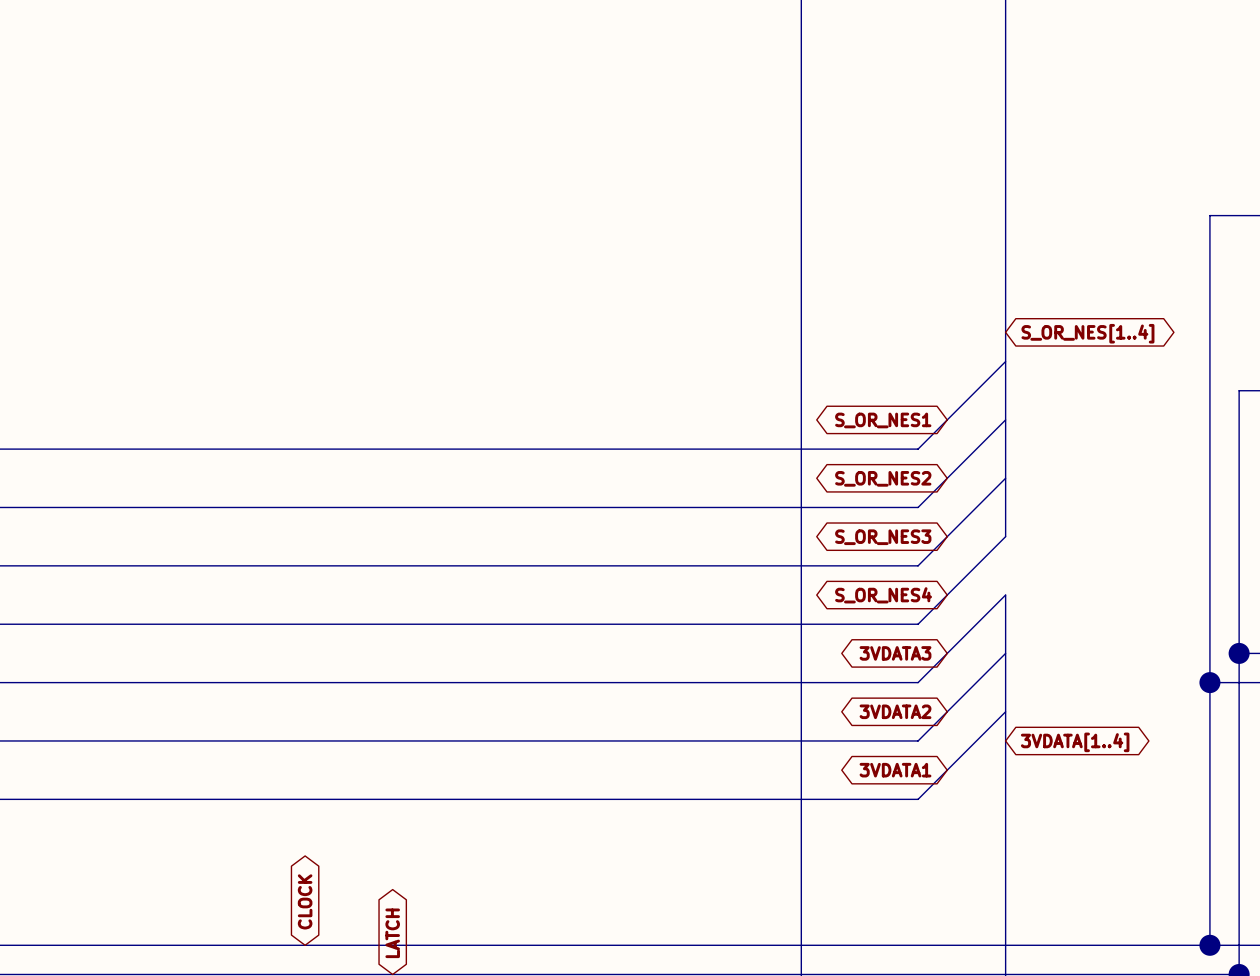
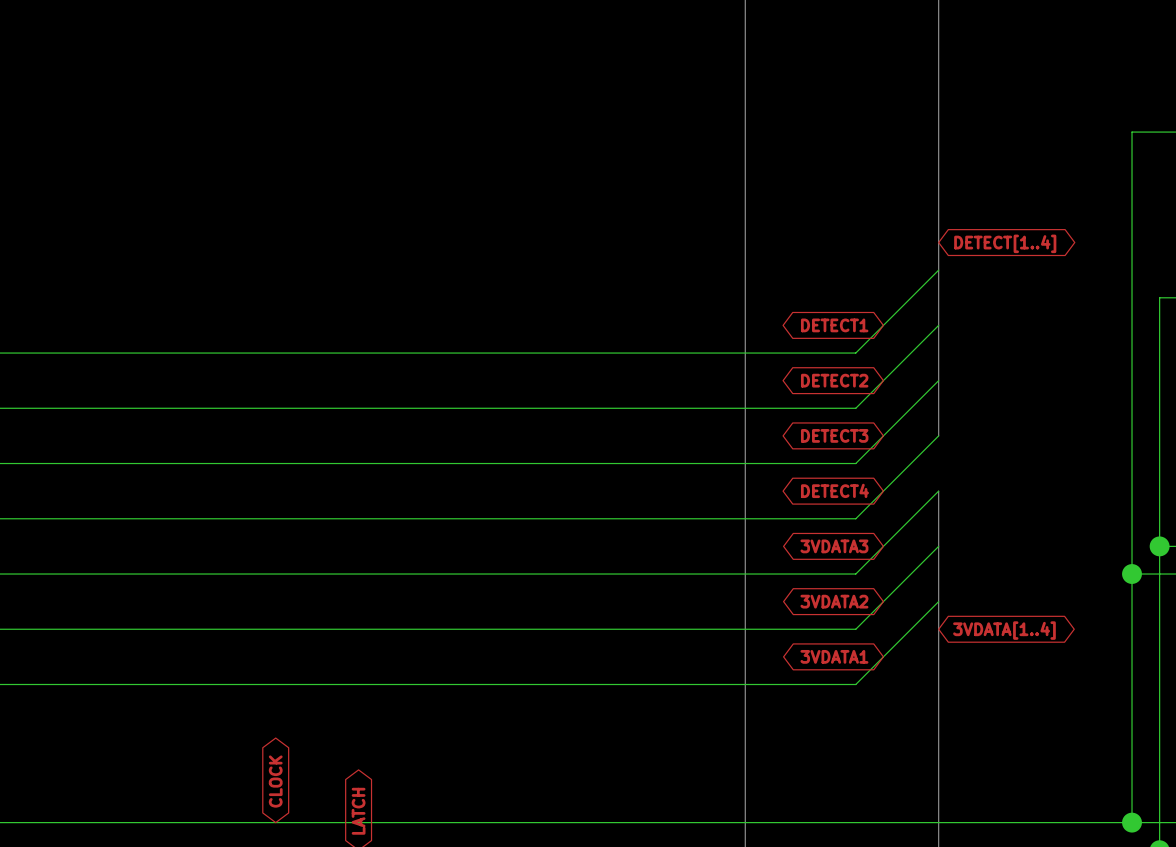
global label: S_OR_NES[1..4] (1087, 333) -> DETECT[1..4] (1005, 243)
global label: S_OR_NES1 (883, 420) -> DETECT1 (834, 325)
global label: S_OR_NES2 (883, 478) -> DETECT2 (834, 380)
global label: S_OR_NES3 (883, 537) -> DETECT3 (834, 435)
global label: S_OR_NES4 (883, 595) -> DETECT4 (834, 490)

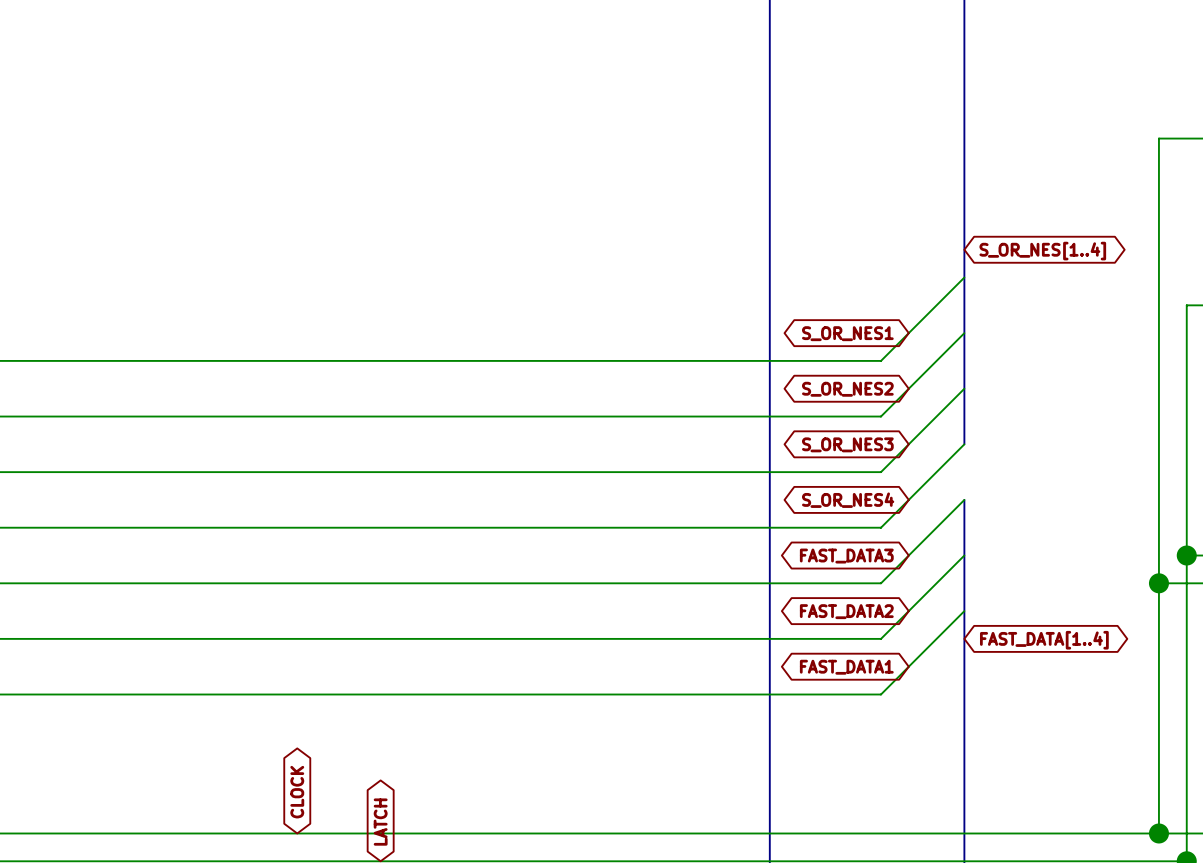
global label: DETECT[1..4] (1005, 243) -> S_OR_NES[1..4] (1042, 251)
global label: DETECT1 (834, 325) -> S_OR_NES1 (847, 333)
global label: DETECT2 (834, 380) -> S_OR_NES2 (847, 389)
global label: DETECT3 (834, 435) -> S_OR_NES3 (847, 444)
global label: DETECT4 (834, 490) -> S_OR_NES4 (848, 500)
global label: 3VDATA3 (834, 546) -> FAST_DATA3 (846, 556)
global label: 3VDATA2 (834, 601) -> FAST_DATA2 (846, 611)
global label: 3VDATA[1..4] (1004, 630) -> FAST_DATA[1..4] (1044, 640)
global label: 3VDATA1 (834, 656) -> FAST_DATA1 (846, 667)

